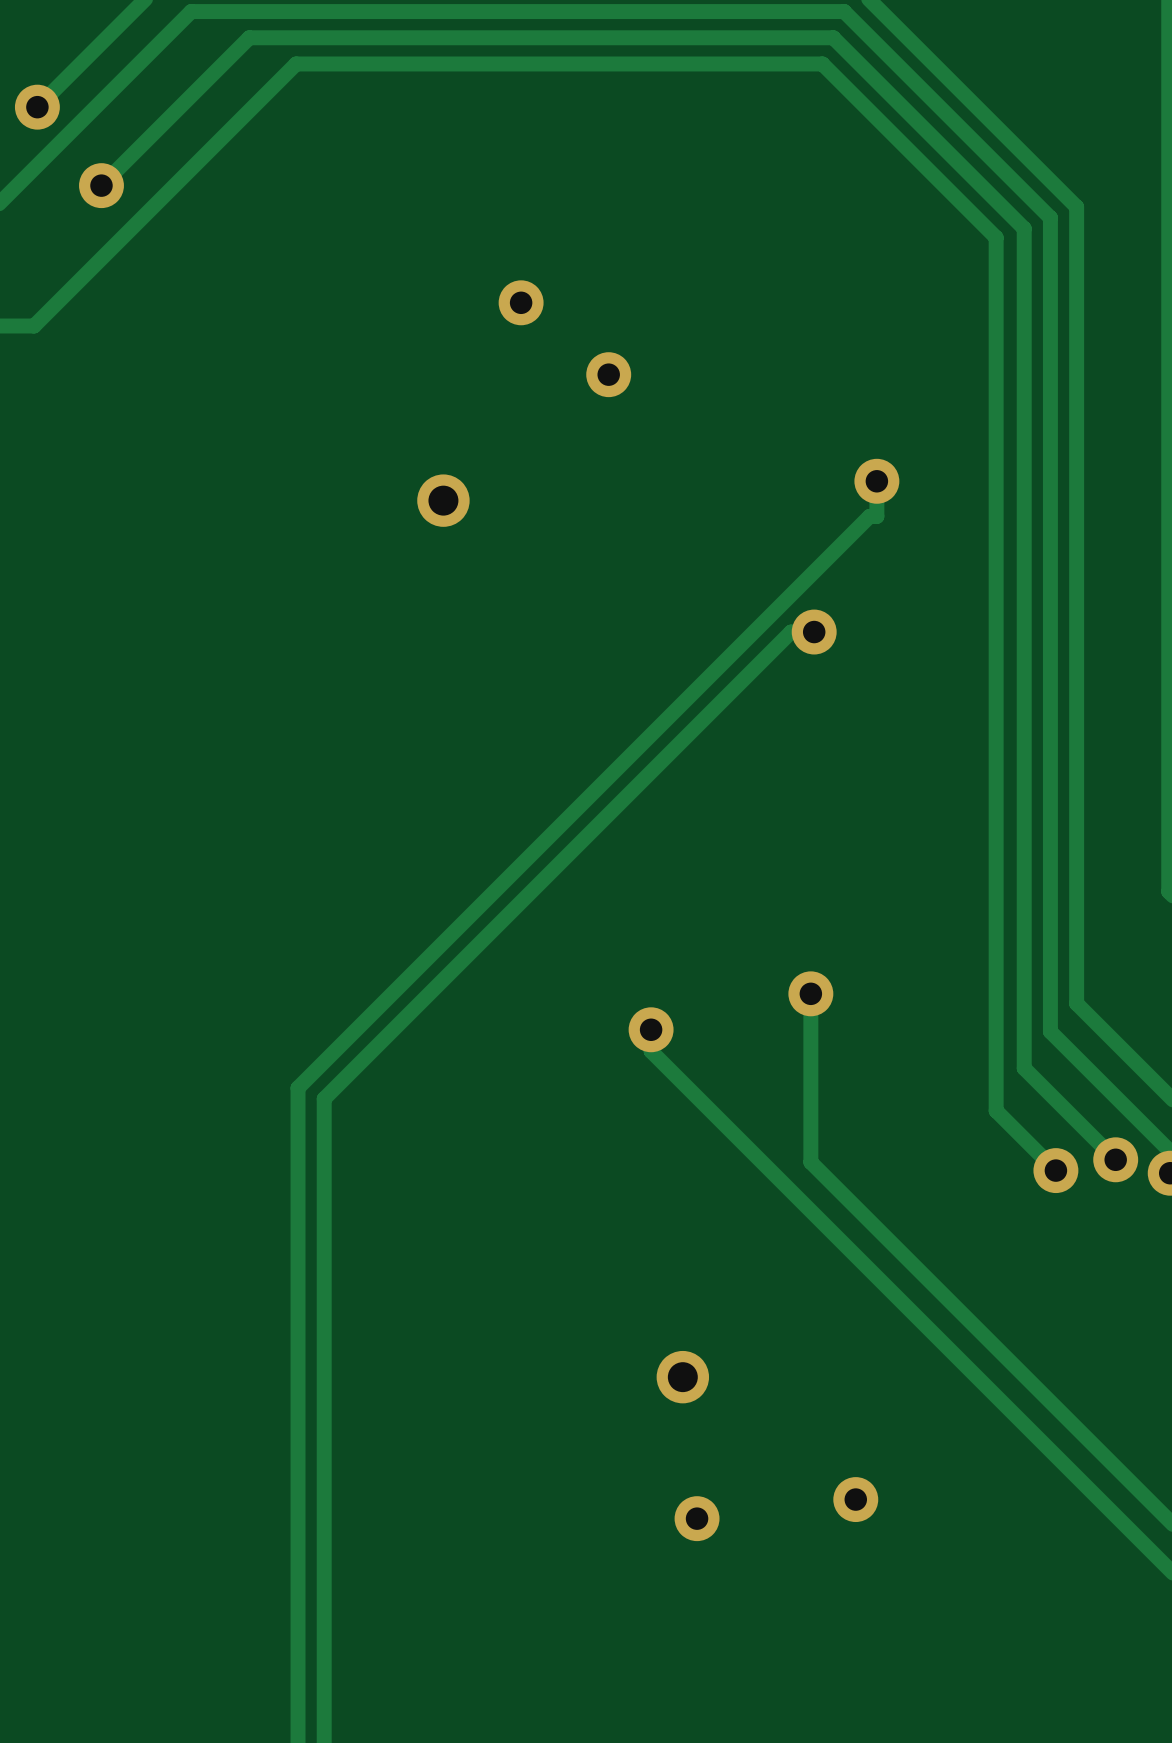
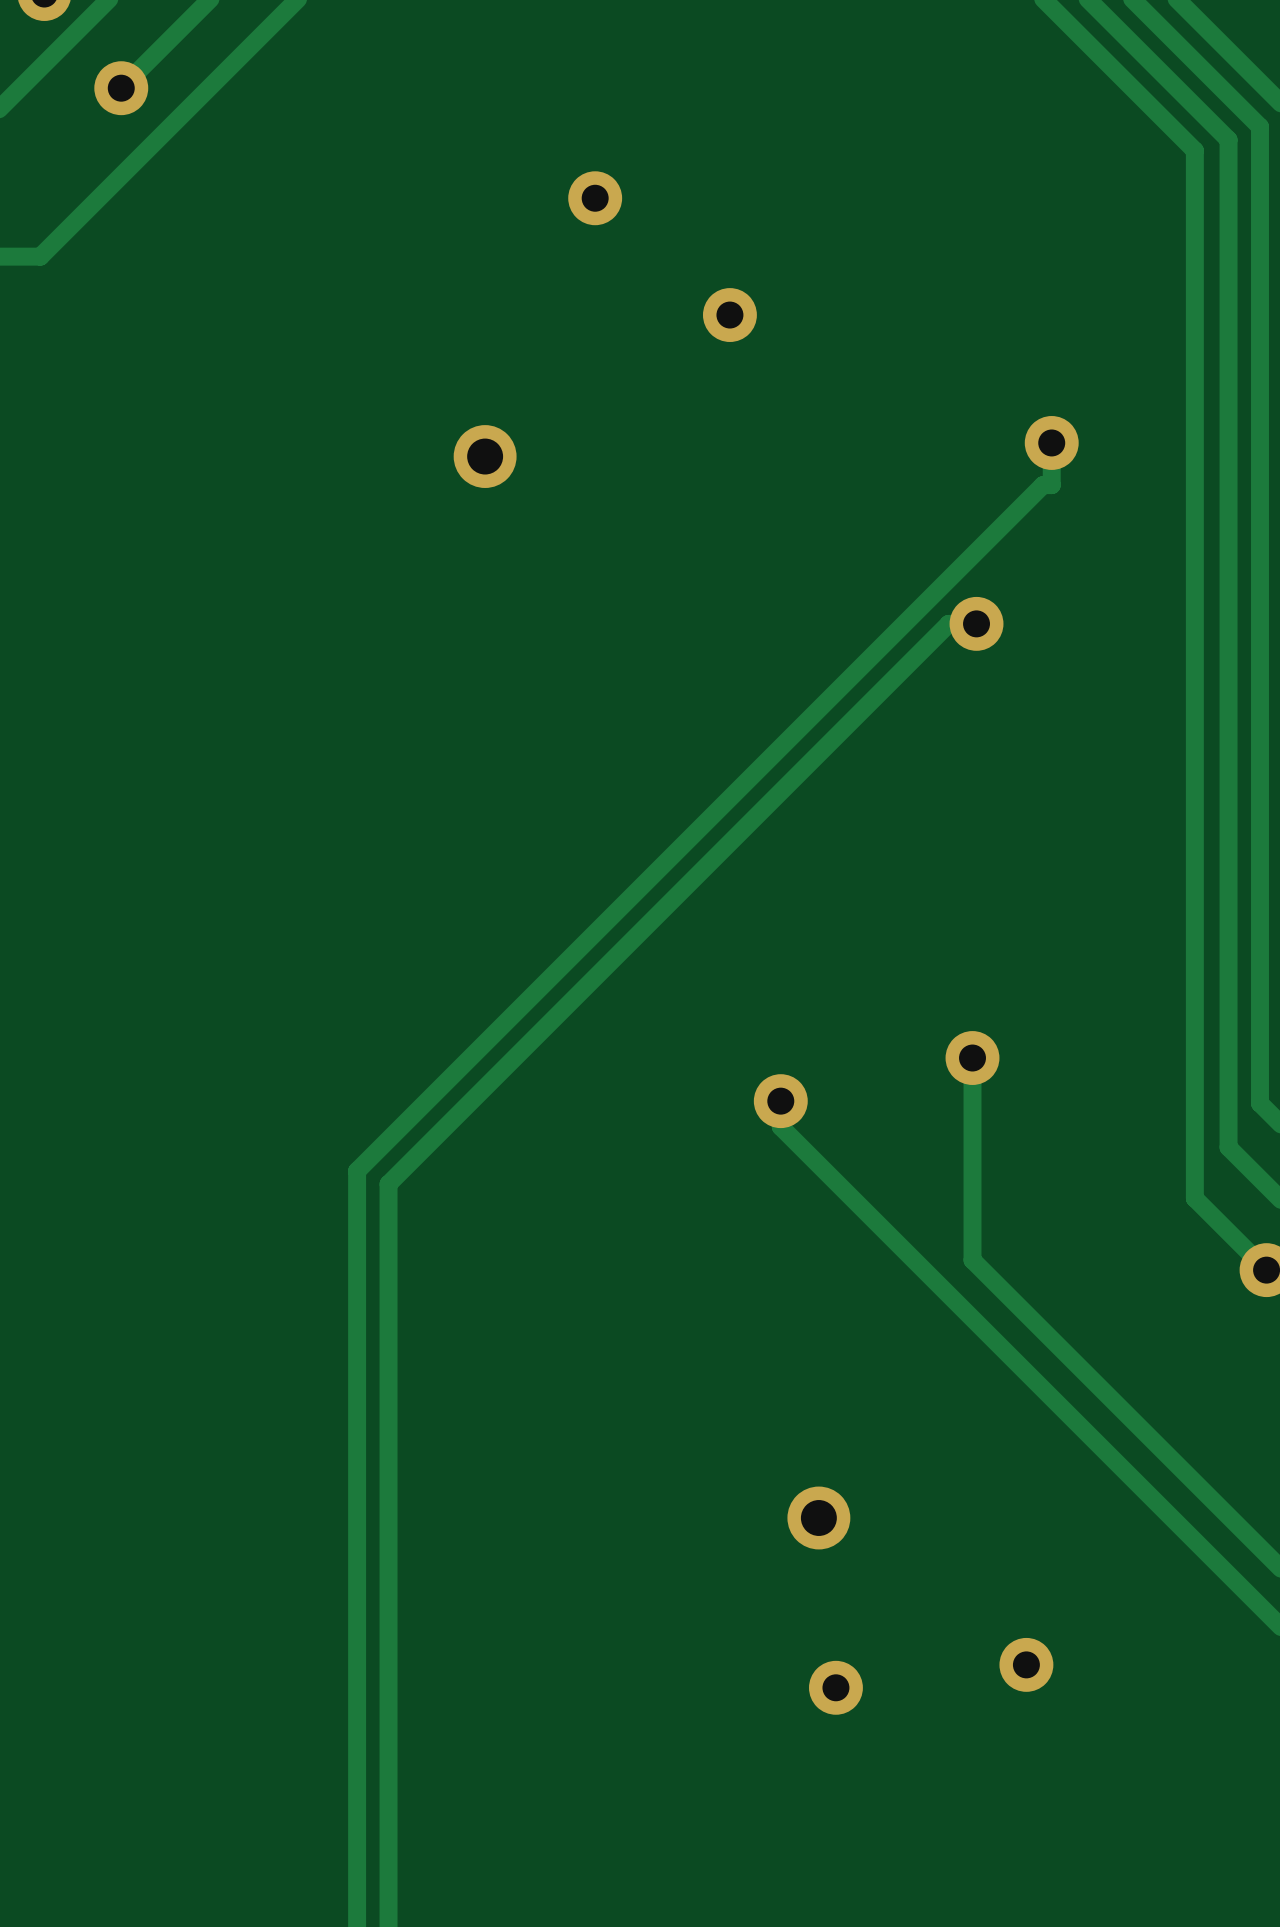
via position: (521, 302) -> (595, 198)
via position: (443, 500) -> (485, 456)

